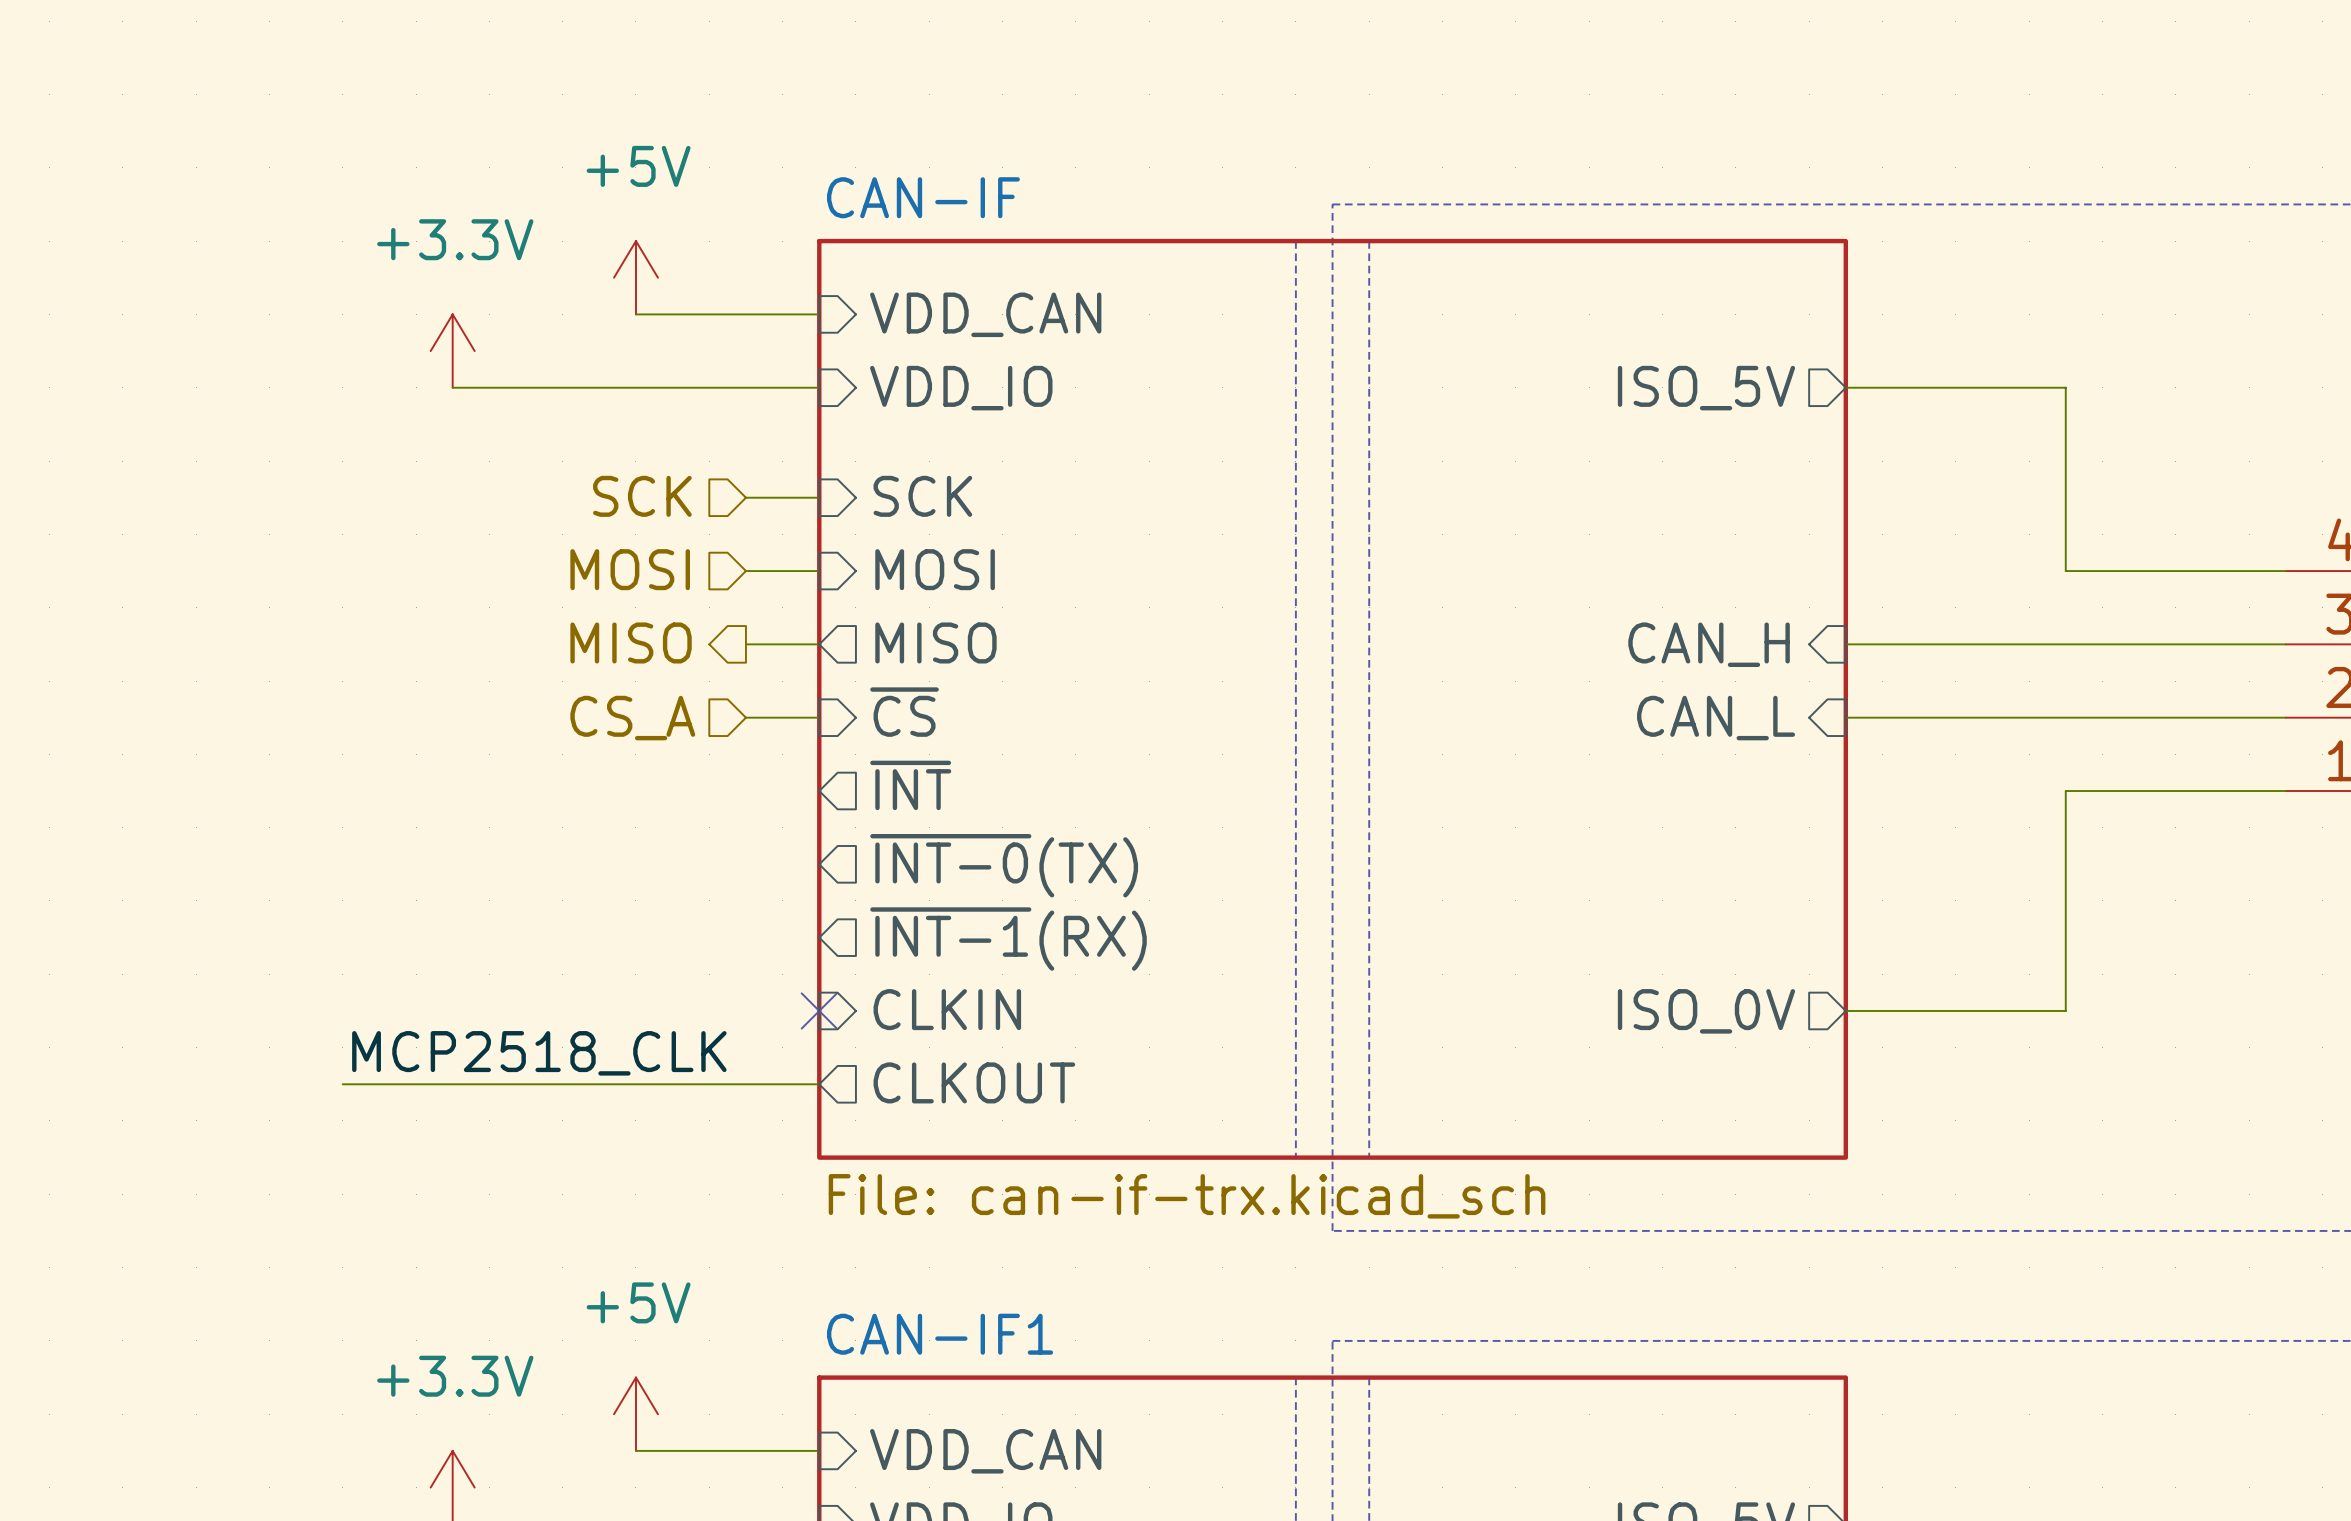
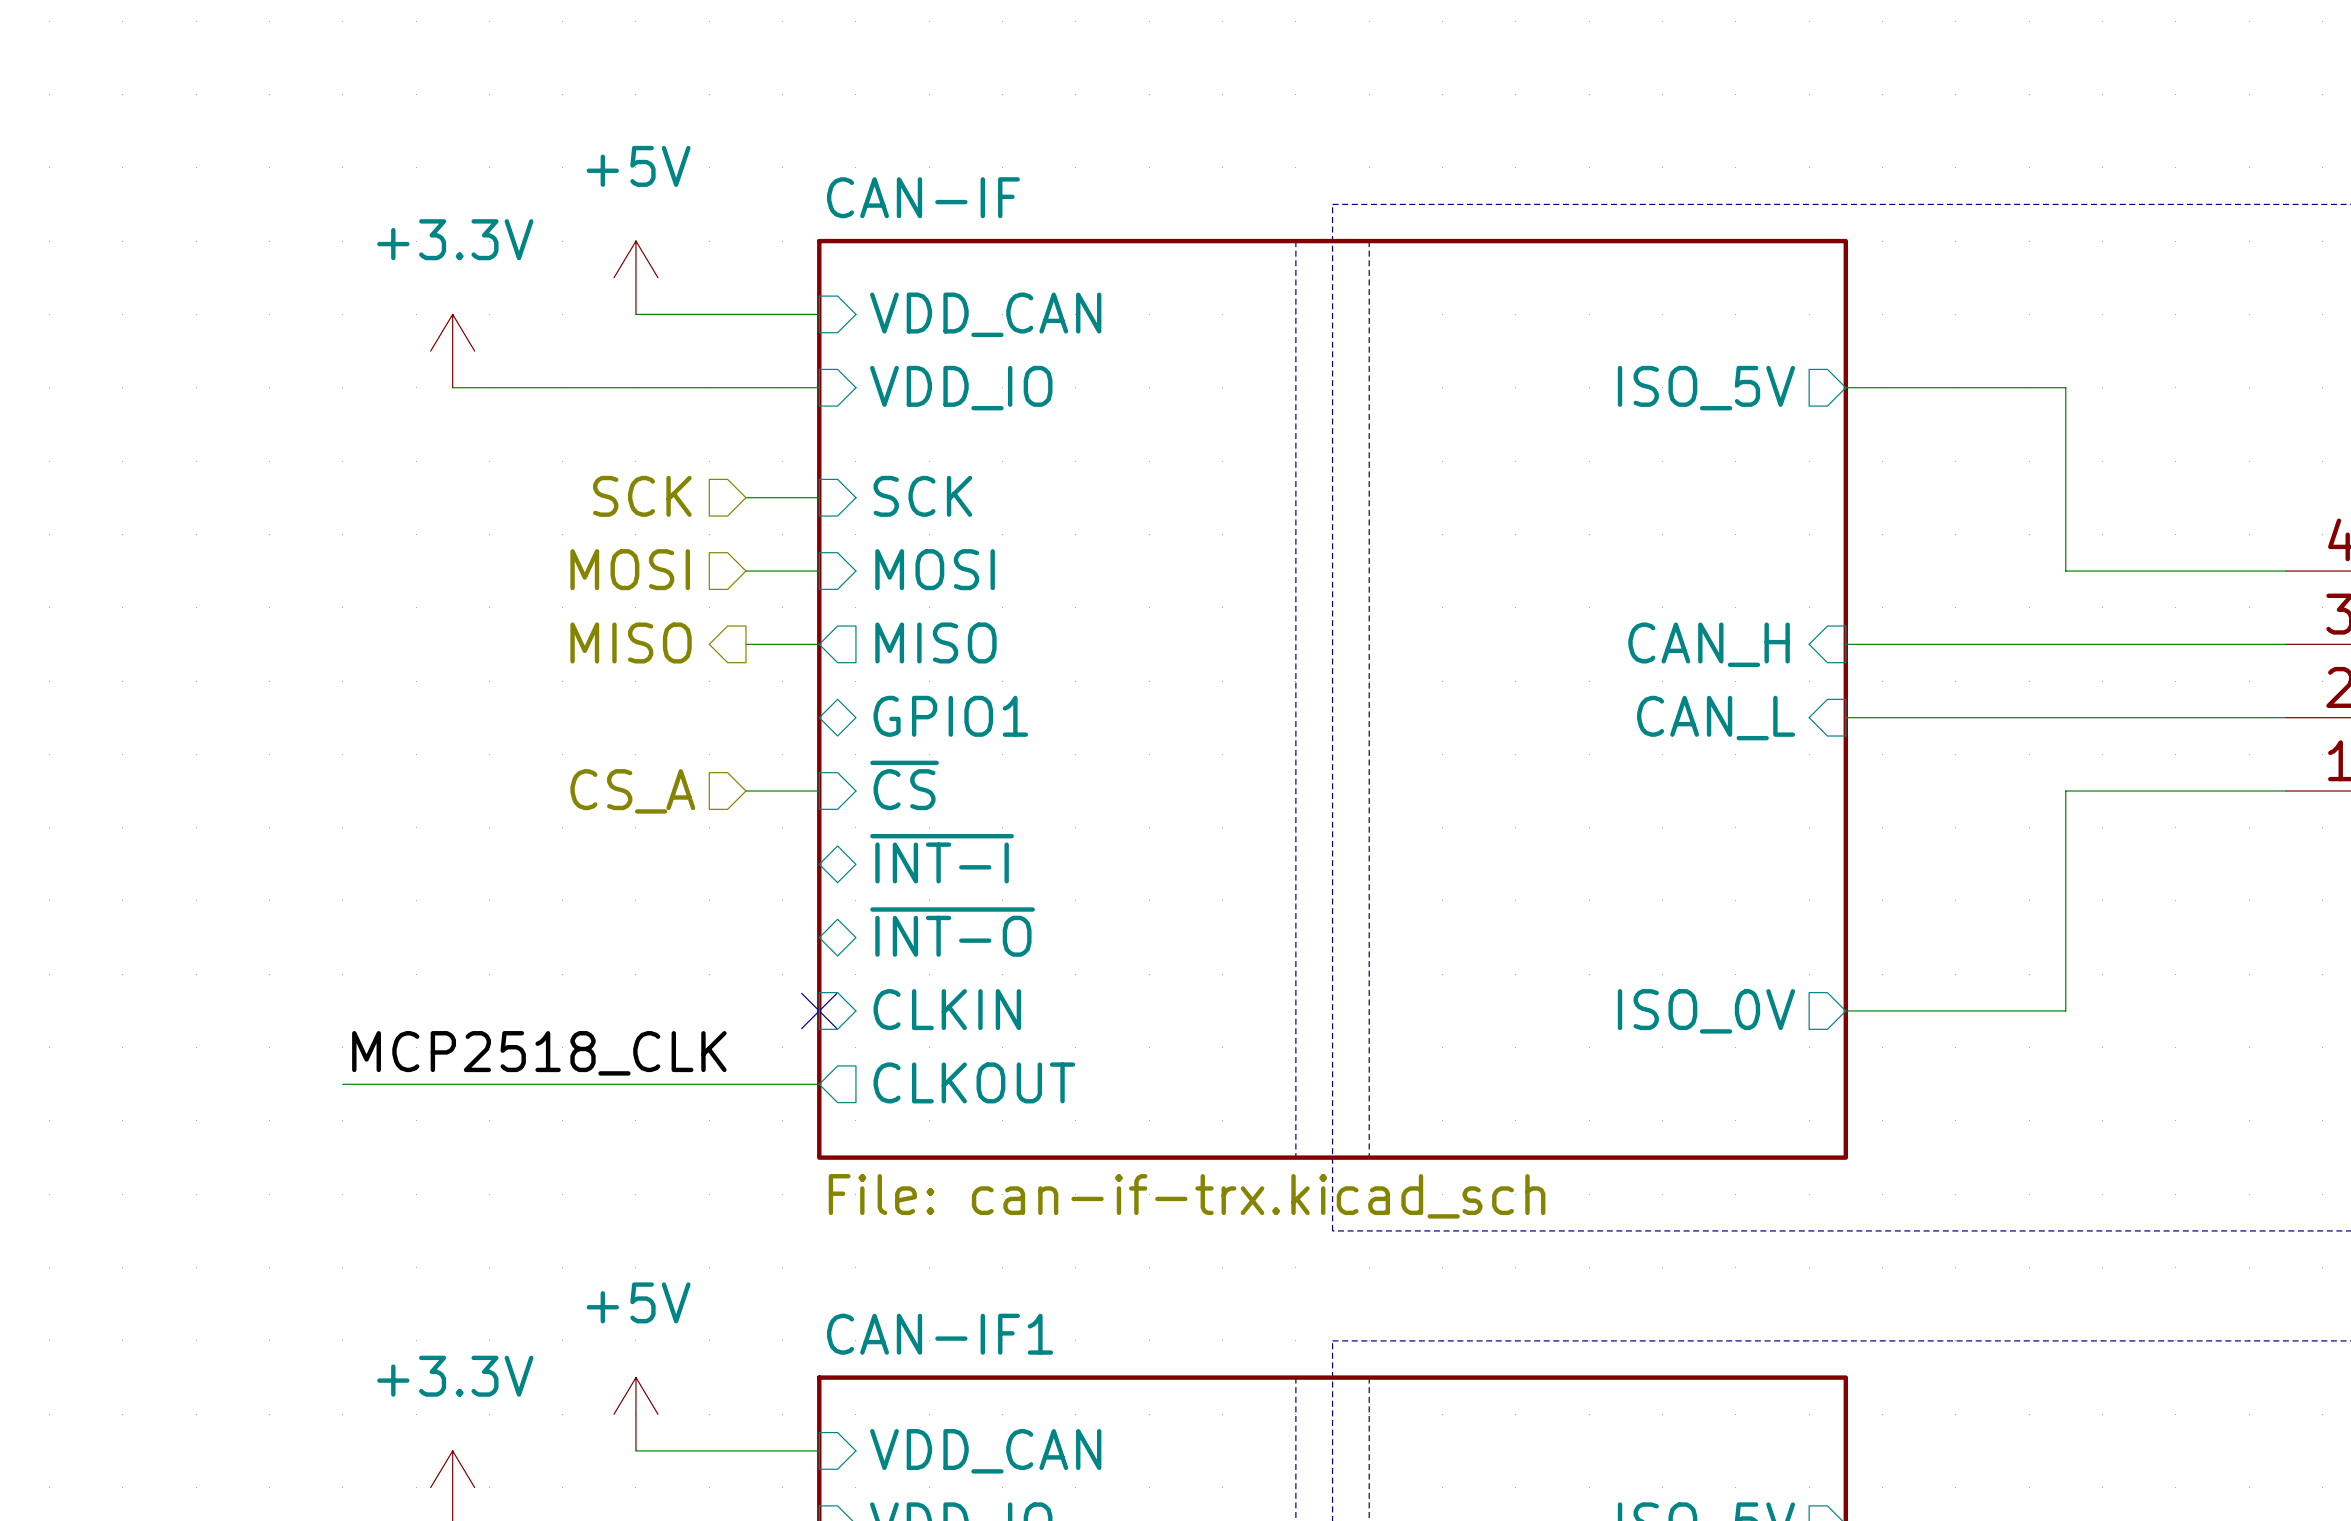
sheet pin shape: input (904, 712) -> bidirectional (950, 716)
sheet pin: ~{CS} (904, 712) -> GPIO1 (950, 716)
wire: (745, 717) (819, 717) -> (745, 791) (819, 791)
hierarchical label position: CS_A (632, 718) -> CS_A (632, 791)
sheet pin shape: output (910, 785) -> input (904, 785)
sheet pin: ~{INT} (910, 785) -> ~{CS} (904, 785)
sheet pin shape: output (1004, 865) -> bidirectional (942, 858)
sheet pin: ~{INT-0}(TX) (1004, 865) -> ~{INT-I} (942, 858)
sheet pin shape: output (1008, 939) -> bidirectional (952, 932)
sheet pin: ~{INT-1}(RX) (1008, 939) -> ~{INT-O} (952, 932)

